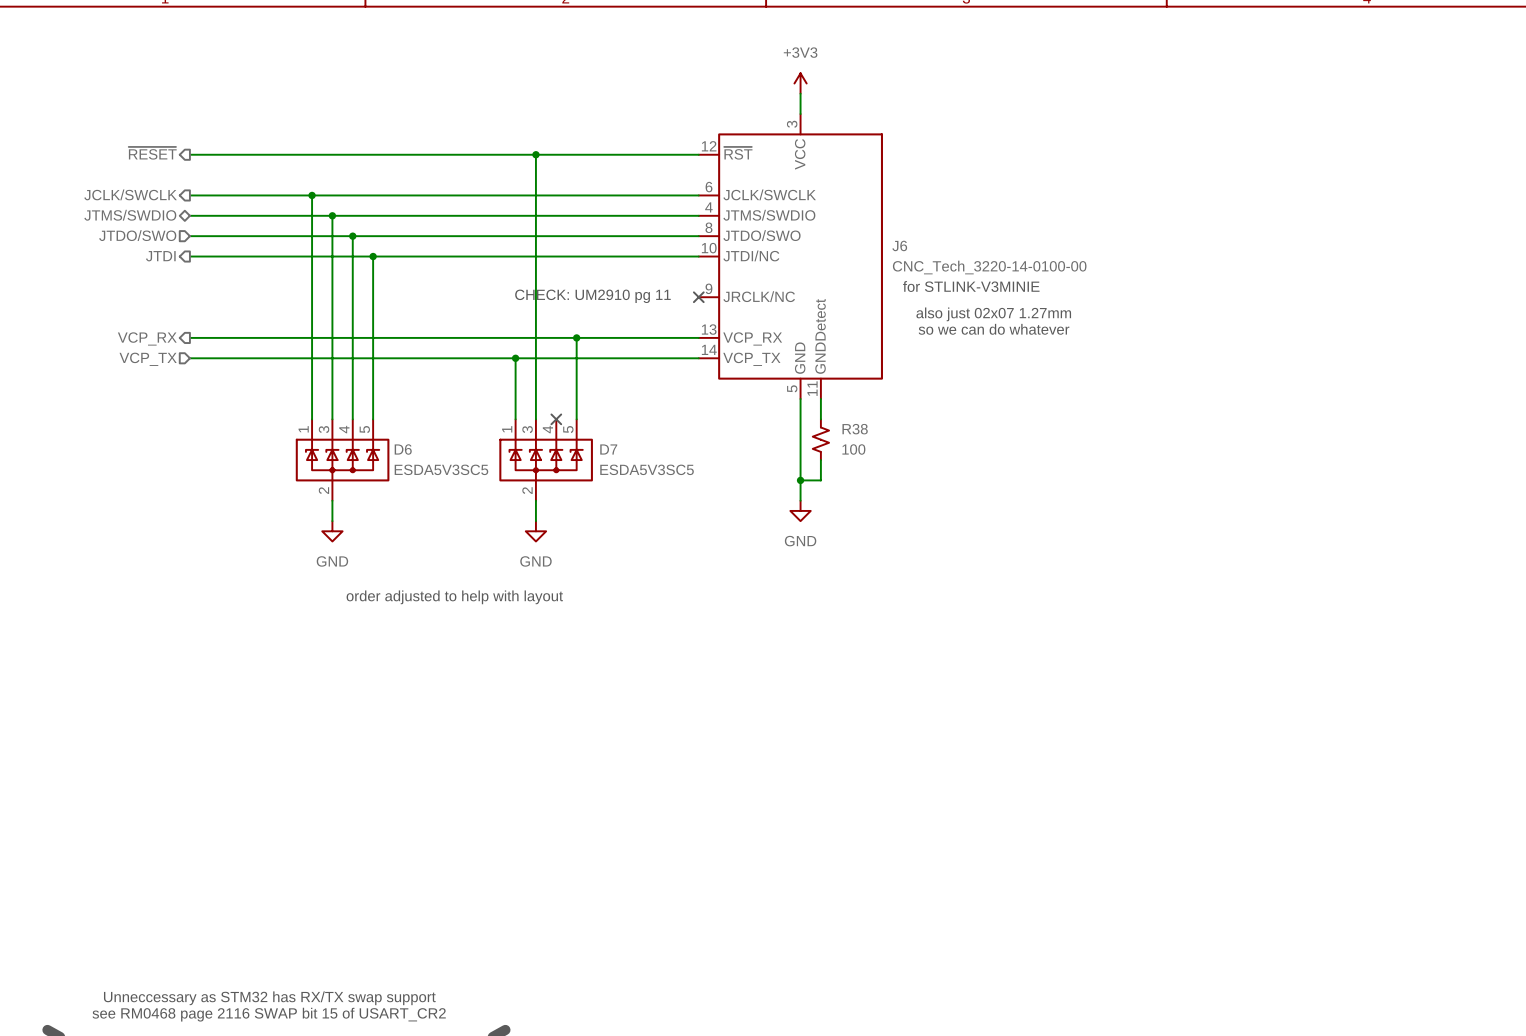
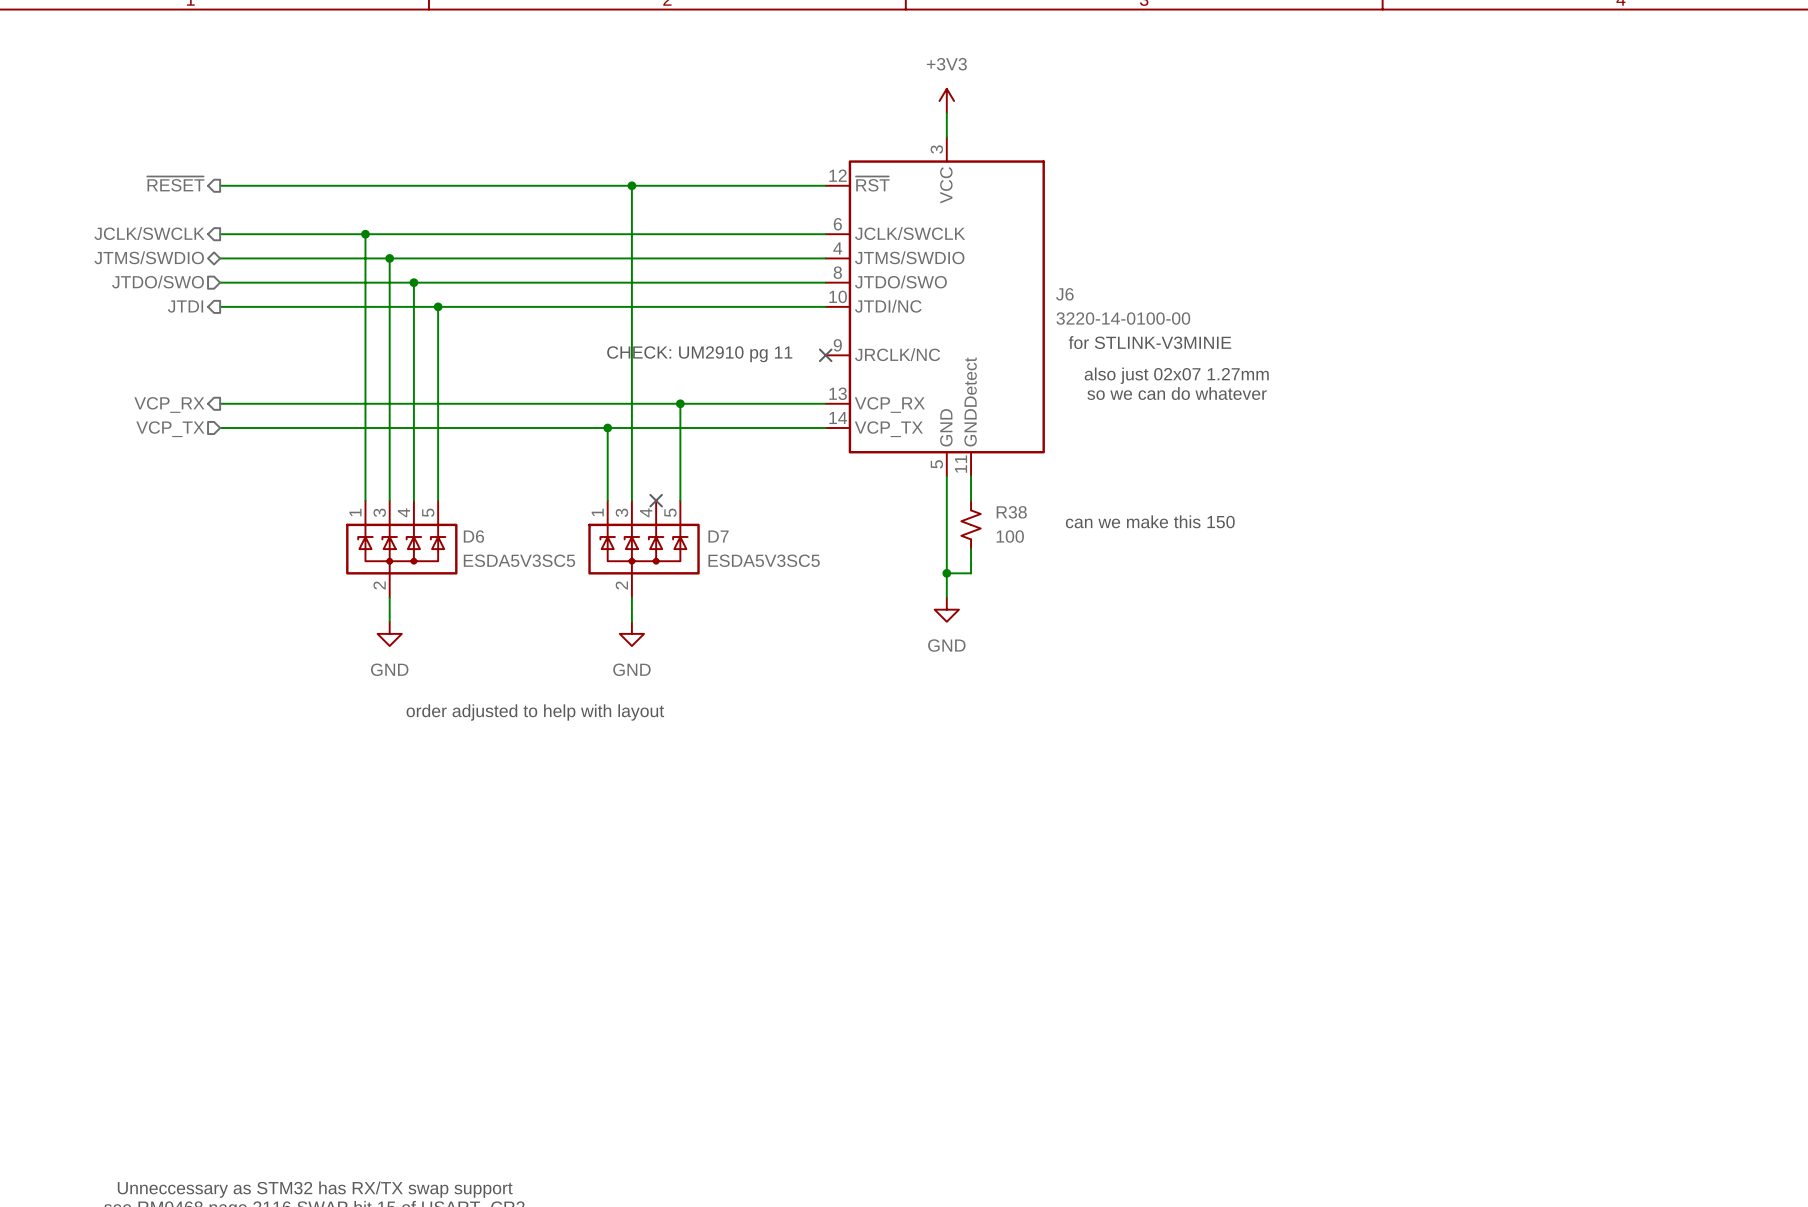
J6 value: CNC_Tech_3220-14-0100-00 (989, 267) -> 3220-14-0100-00 (1123, 318)
text: none -> can we make this 150 (1150, 521)

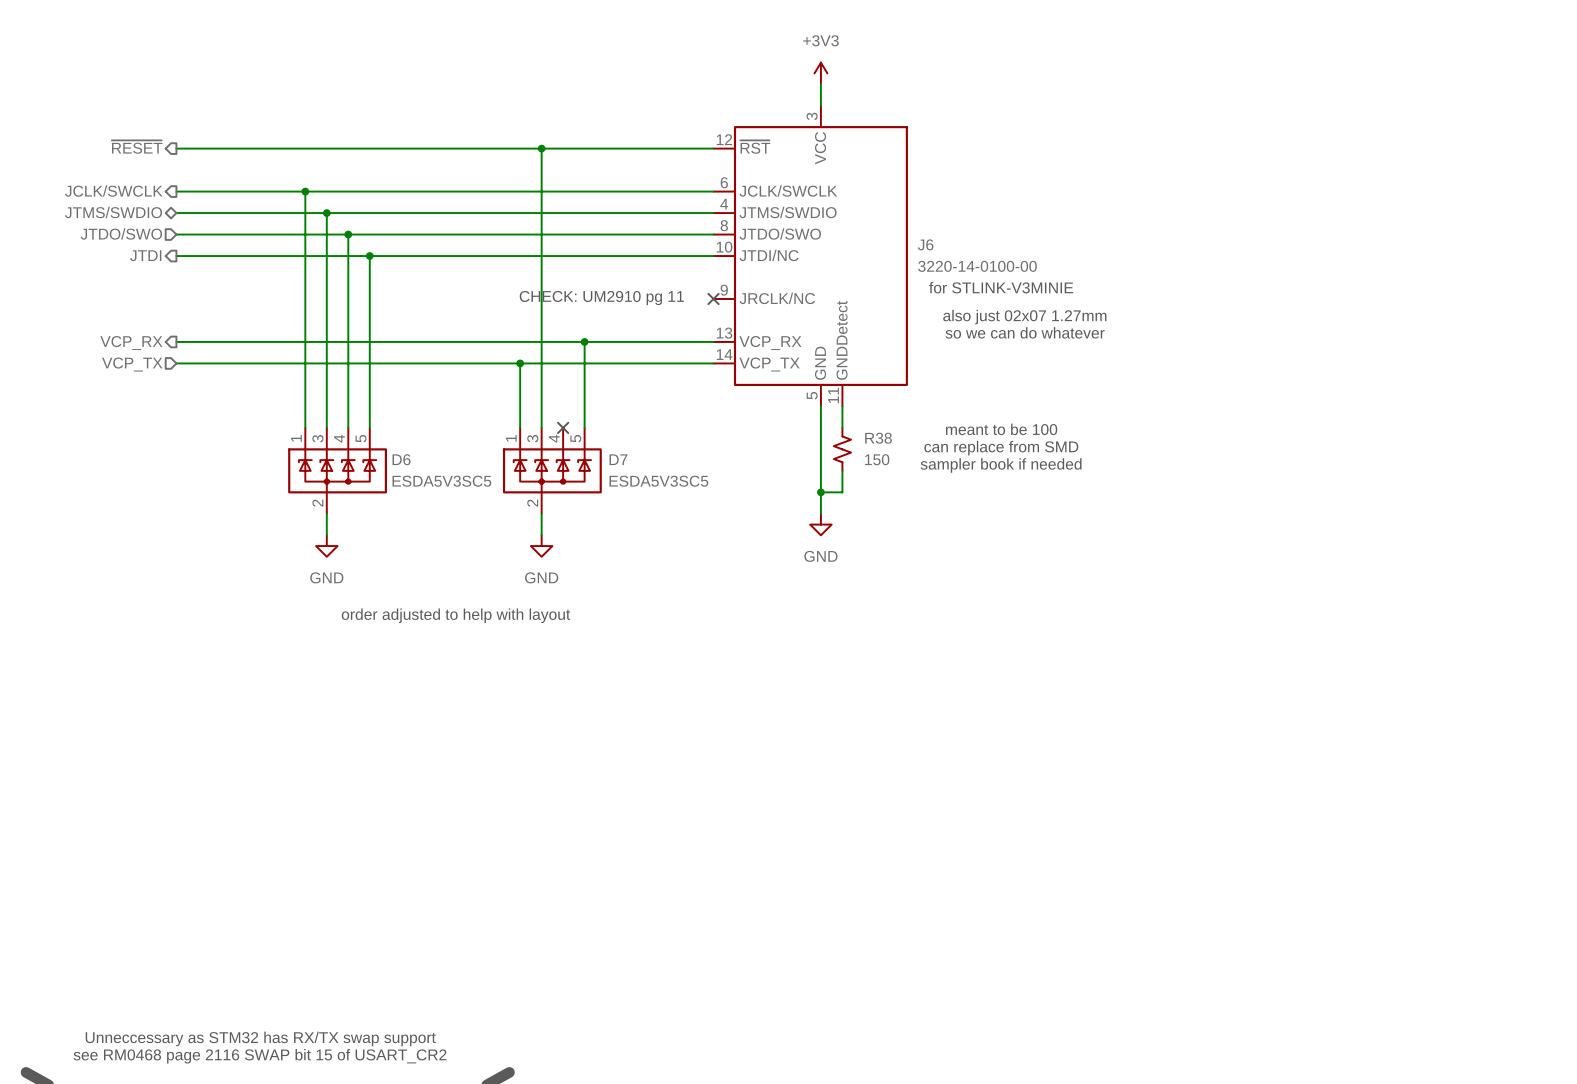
text: none -> meant to be 100 (1001, 429)
text: can we make this 150 (1150, 521) -> can replace from SMD (1001, 448)
R38 value: 100 (1010, 536) -> 150 (877, 459)
text: none -> sampler book if needed (1001, 465)

